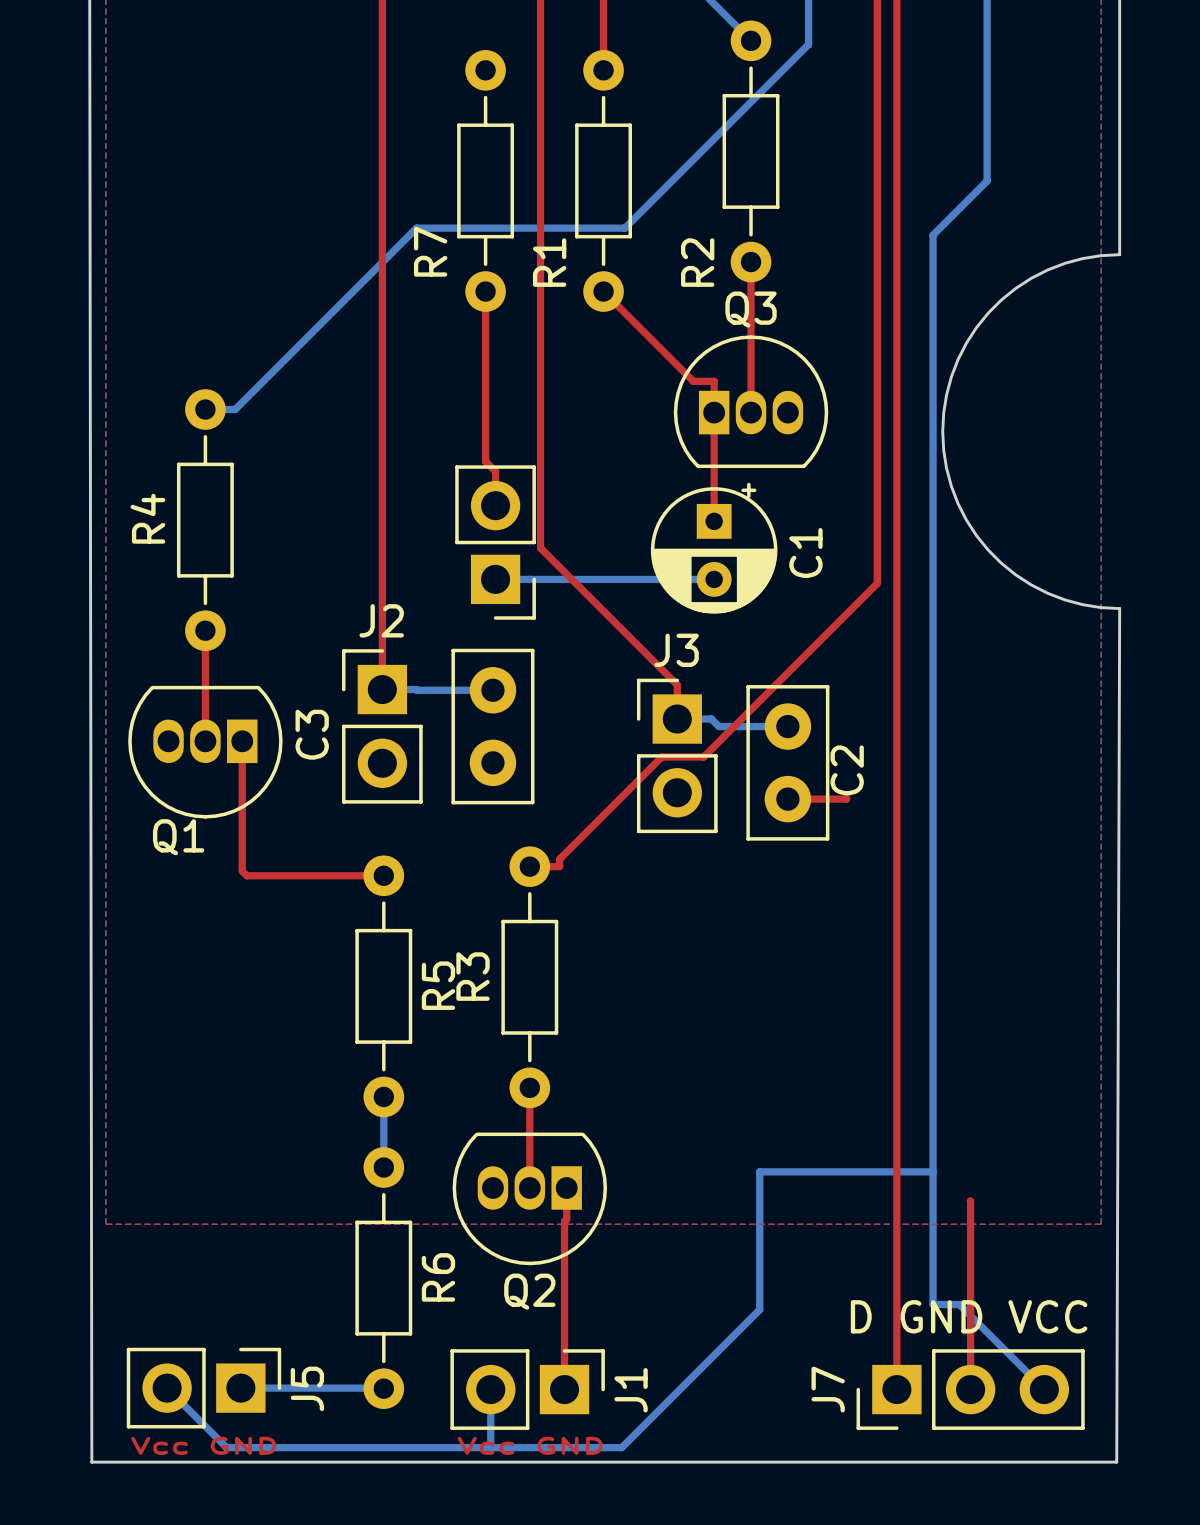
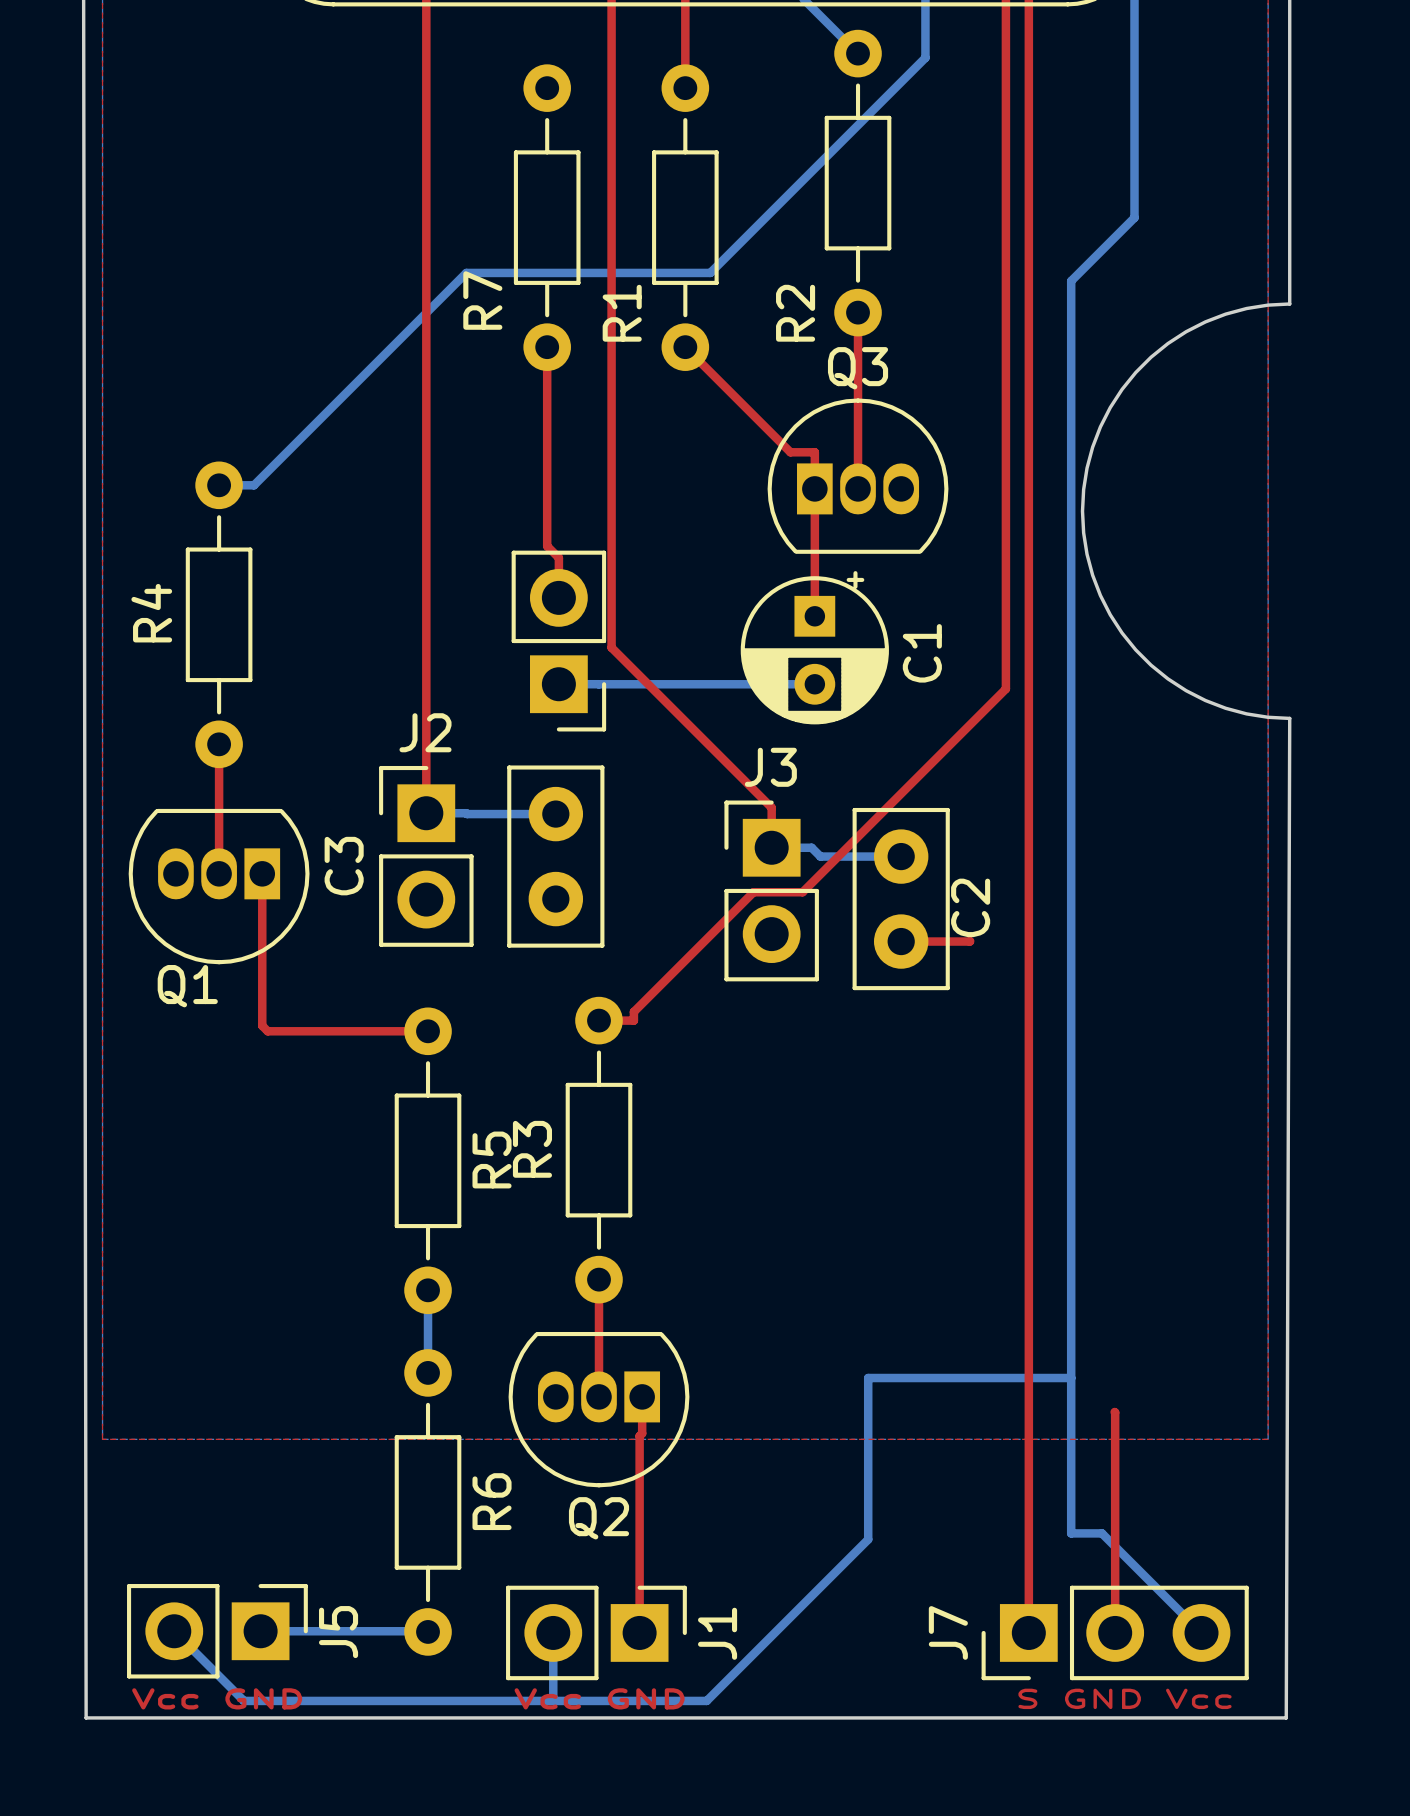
text: D GND VCC (969, 1316) -> none
text: none -> S GND Vcc (1124, 1698)

